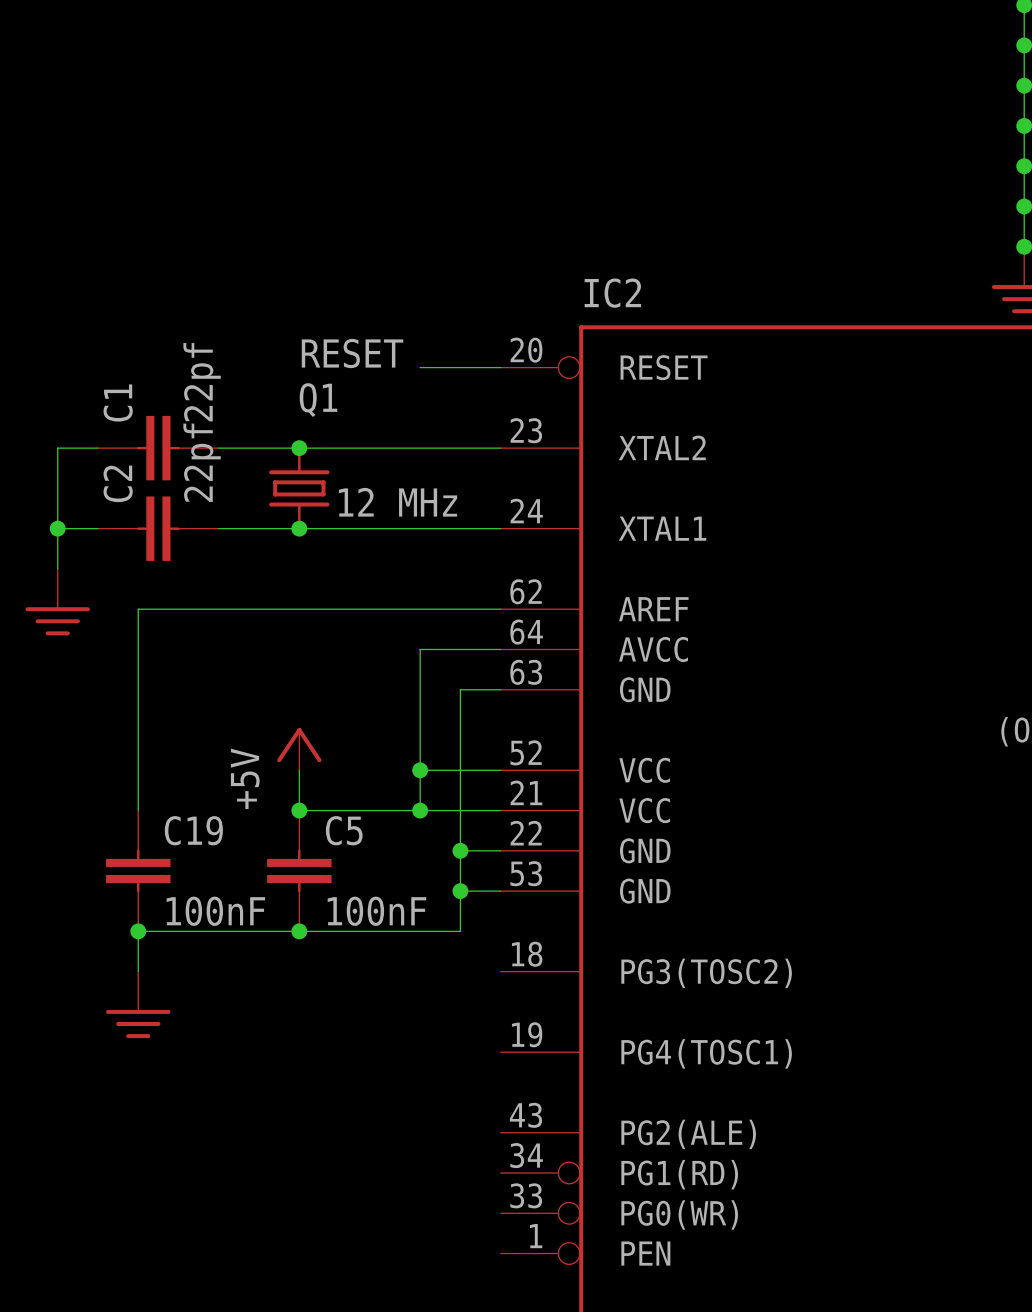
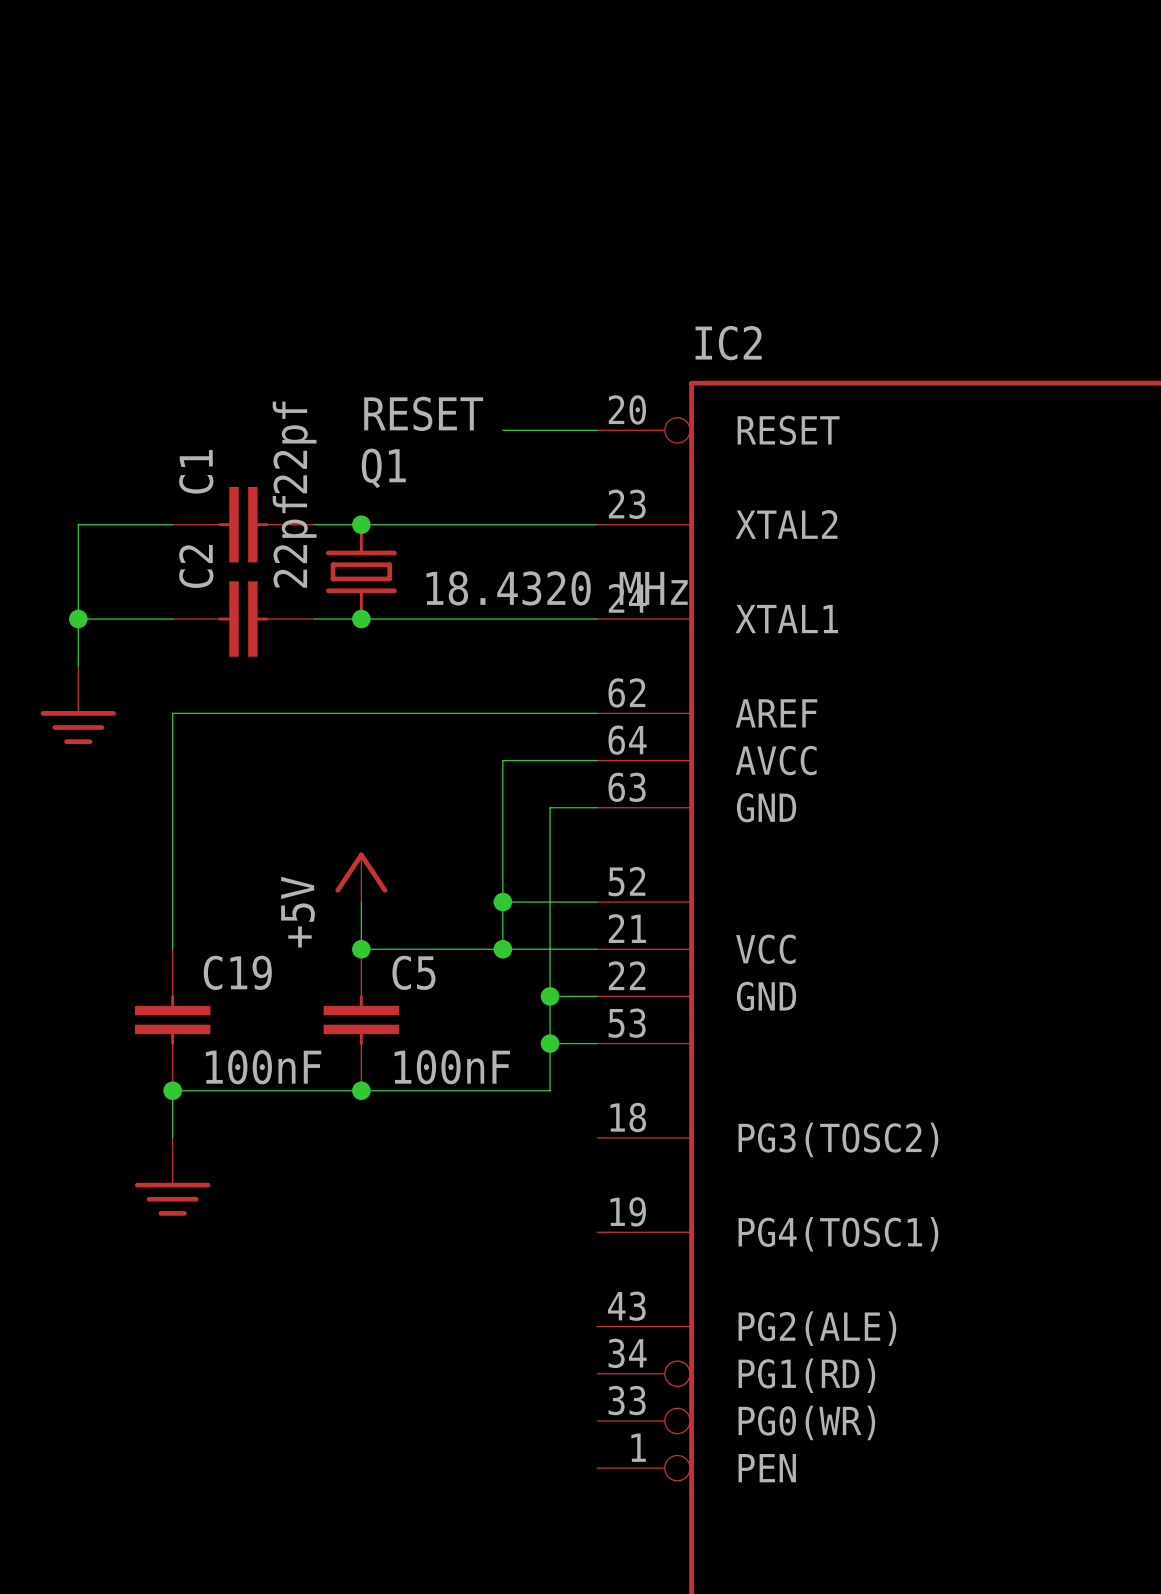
C1 position: (158, 448) -> (243, 524)
Q1 value: 12 MHz (398, 502) -> 18.4320 MHz (557, 588)
C2 position: (158, 528) -> (243, 619)
IC2 pin name: VCC (644, 770) -> none
IC2 pin name: GND (645, 891) -> none

